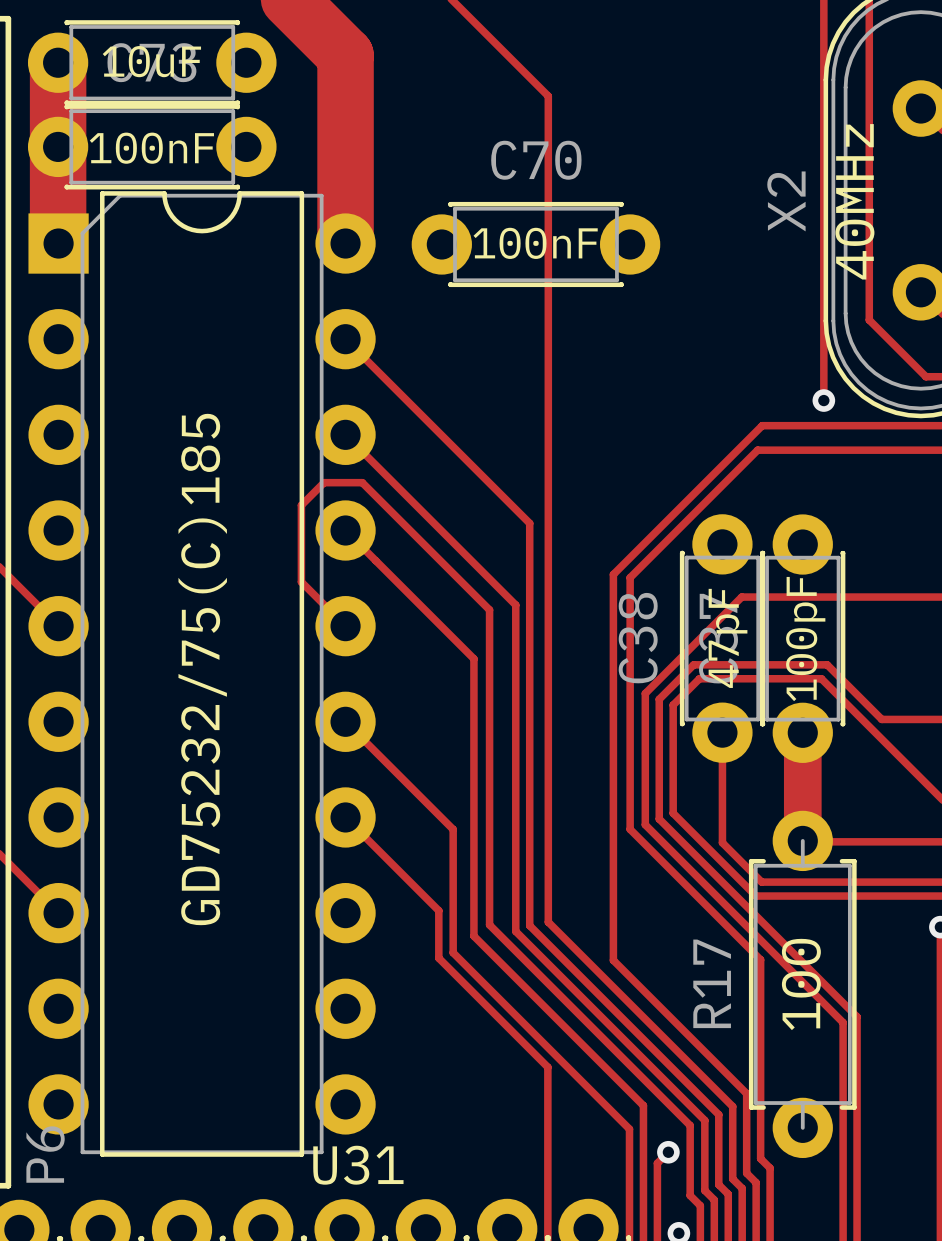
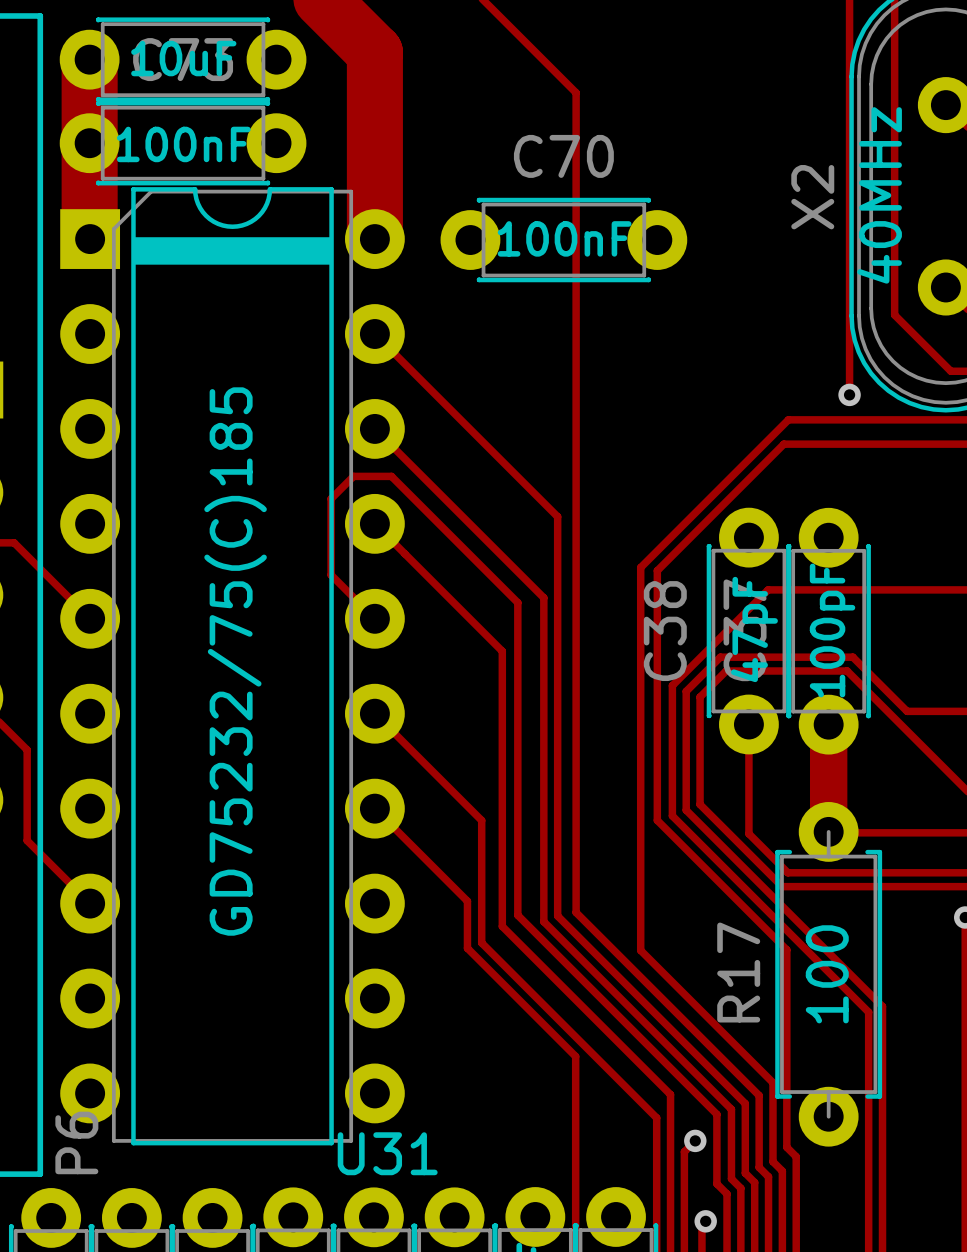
U31 footprint: [28, 191, 376, 1157] -> [60, 187, 405, 1146]

